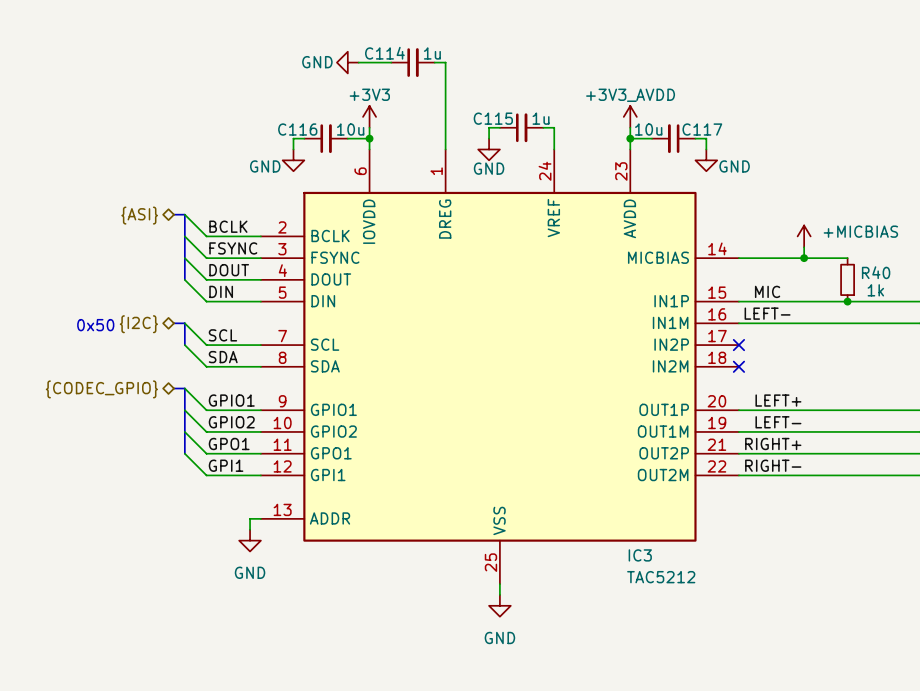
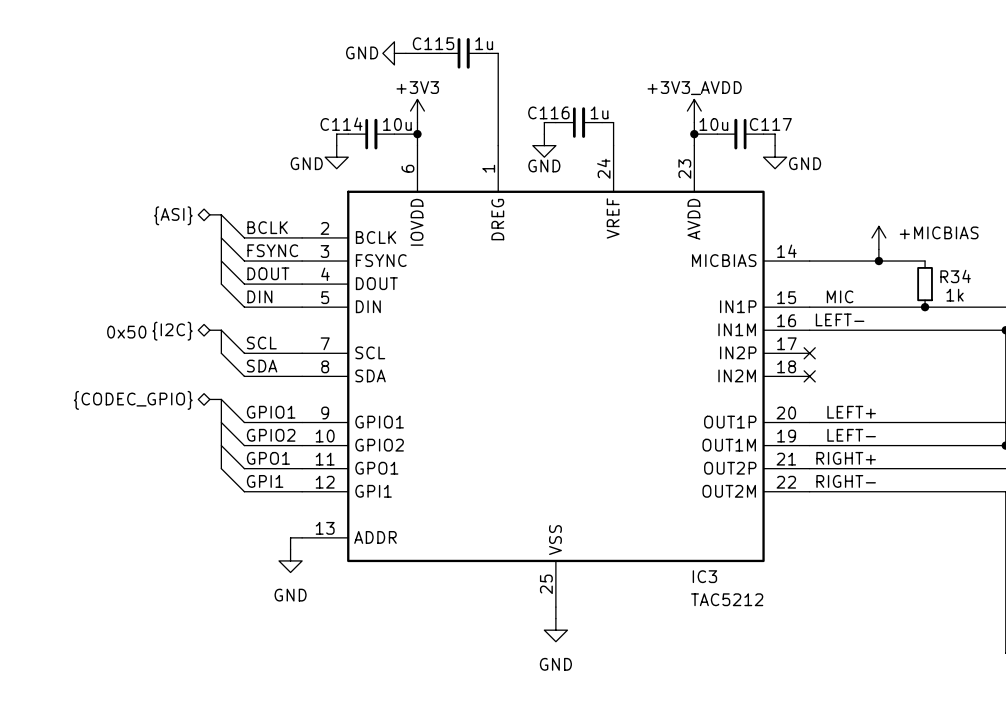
C114 name: C114 (384, 53) -> C115 (433, 43)
C115 name: C115 (493, 118) -> C116 (548, 112)
C116 name: C116 (297, 129) -> C114 (341, 124)
R40 name: R40 (876, 272) -> R34 (955, 276)

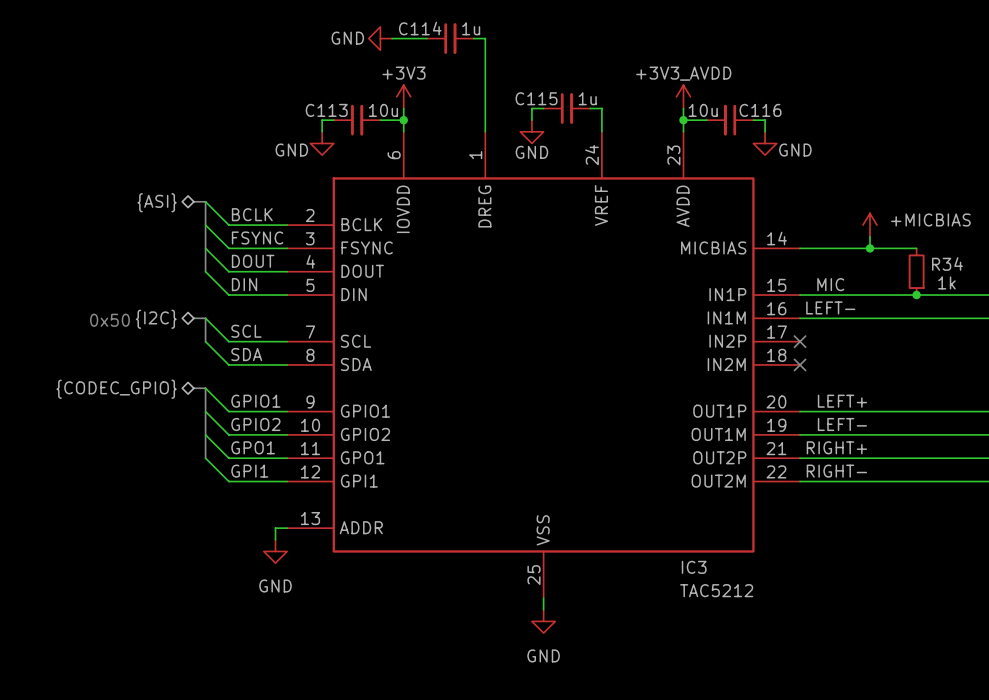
C115 name: C115 (433, 43) -> C114 (420, 28)
C116 name: C116 (548, 112) -> C115 (536, 98)
C114 name: C114 (341, 124) -> C113 (326, 110)
C117 name: C117 (770, 124) -> C116 (760, 110)

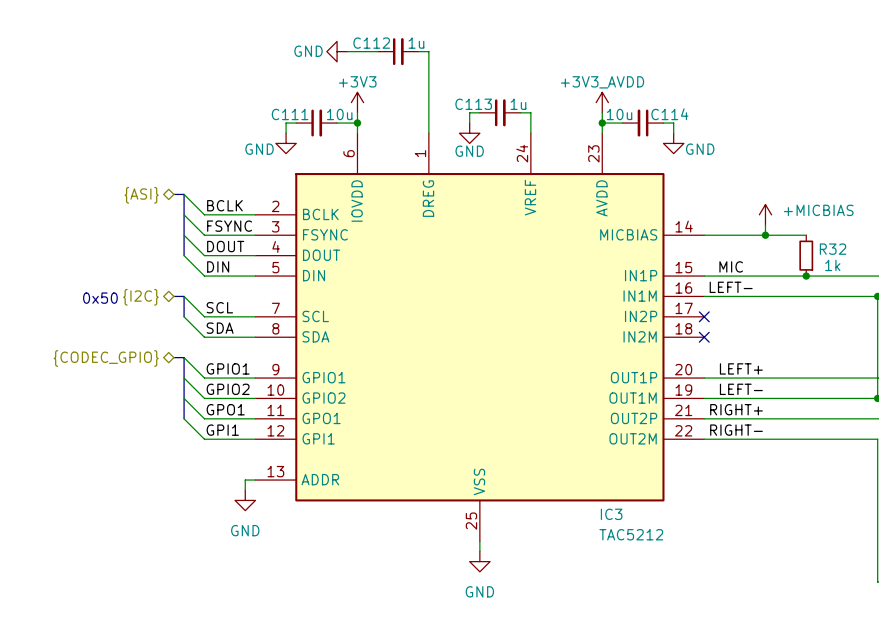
C114 name: C114 (420, 28) -> C112 (371, 43)
C115 name: C115 (536, 98) -> C113 (473, 104)
C113 name: C113 (326, 110) -> C111 (290, 114)
C116 name: C116 (760, 110) -> C114 (669, 114)
R34 name: R34 (947, 264) -> R32 (833, 249)

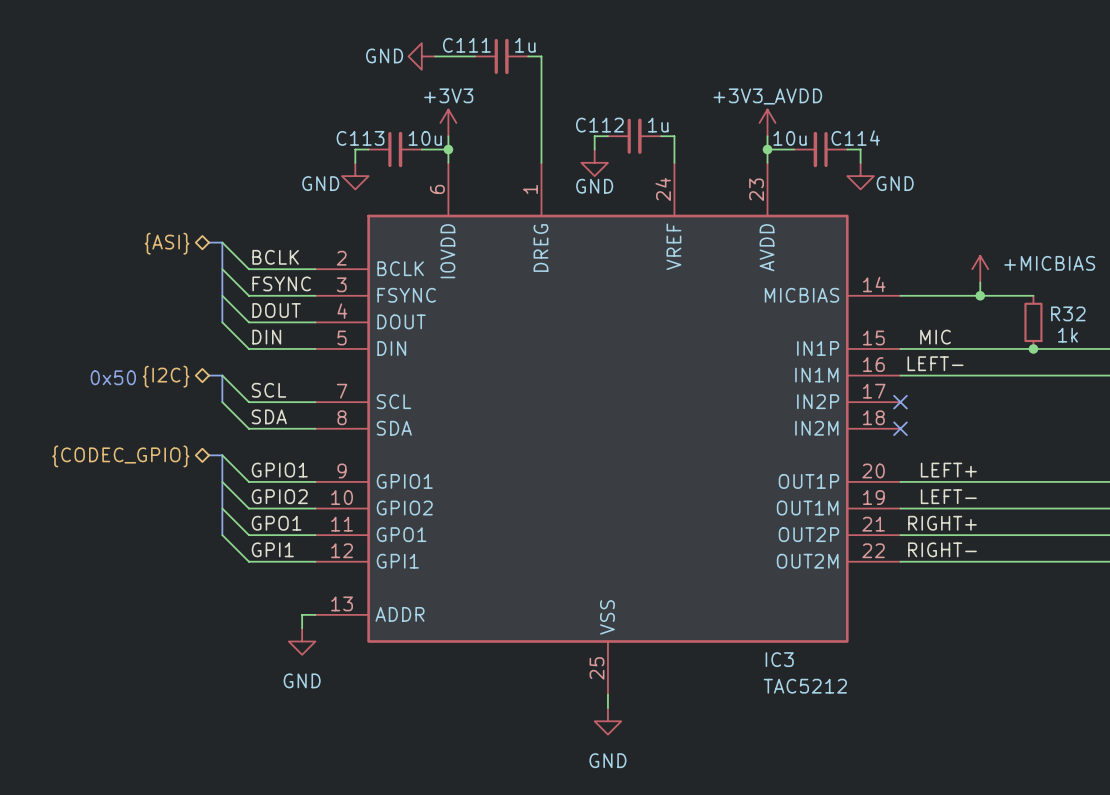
C112 name: C112 (371, 43) -> C111 (466, 45)
C113 name: C113 (473, 104) -> C112 (599, 125)
C111 name: C111 (290, 114) -> C113 (360, 138)

